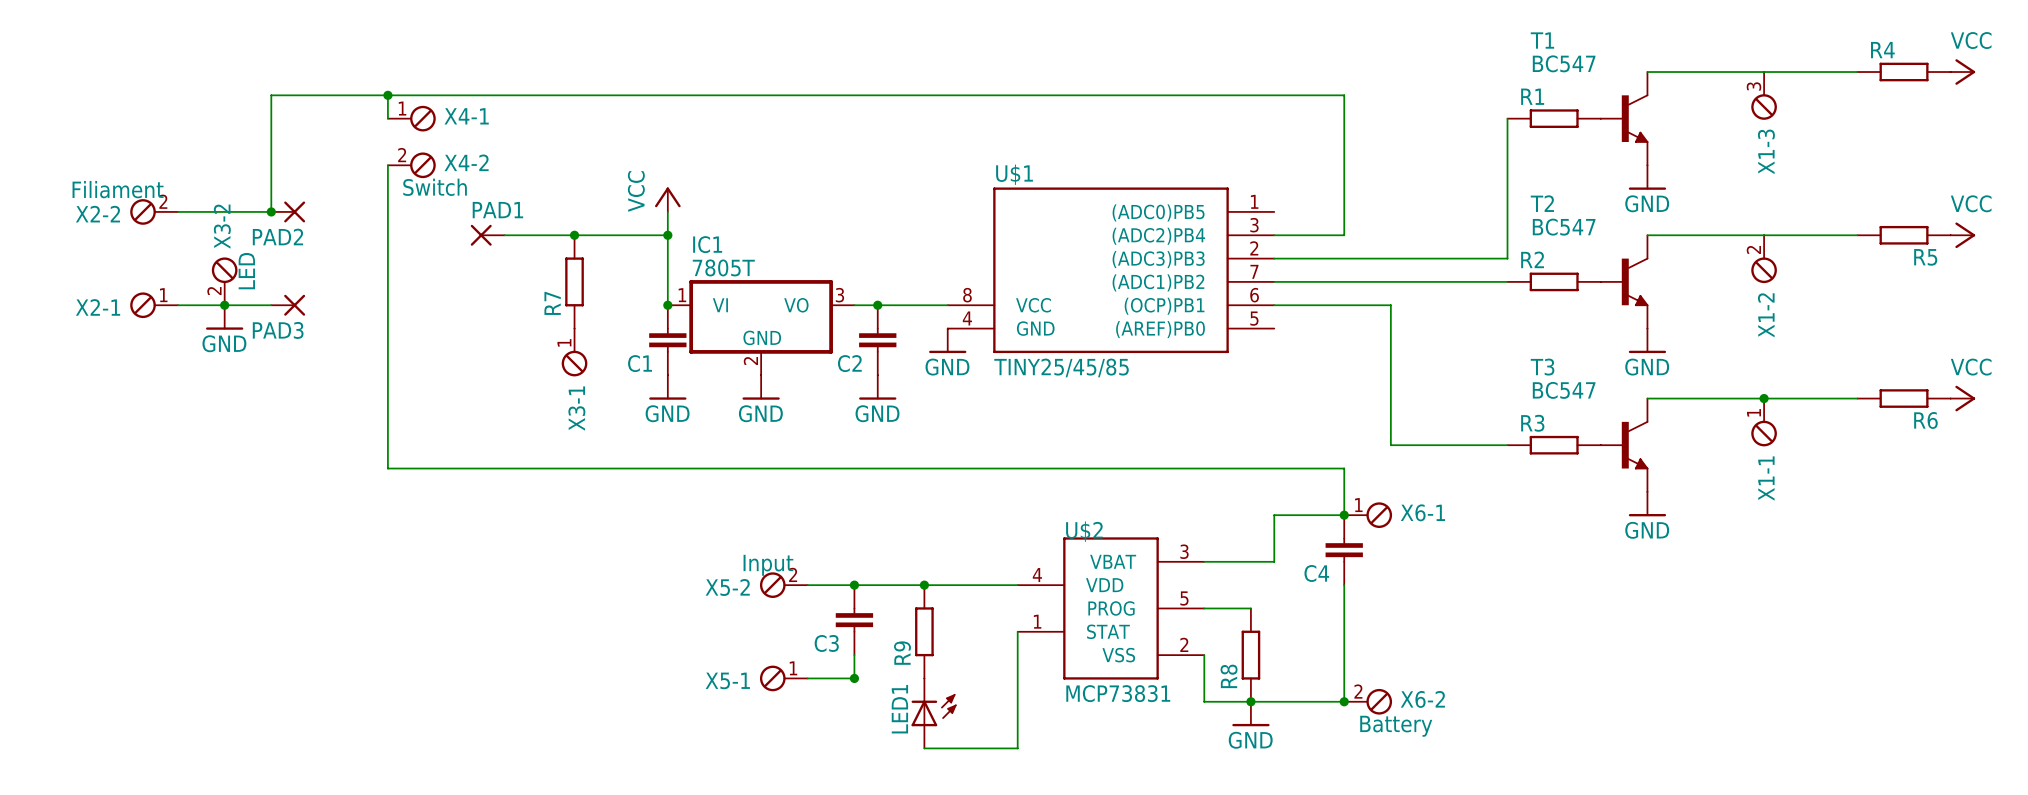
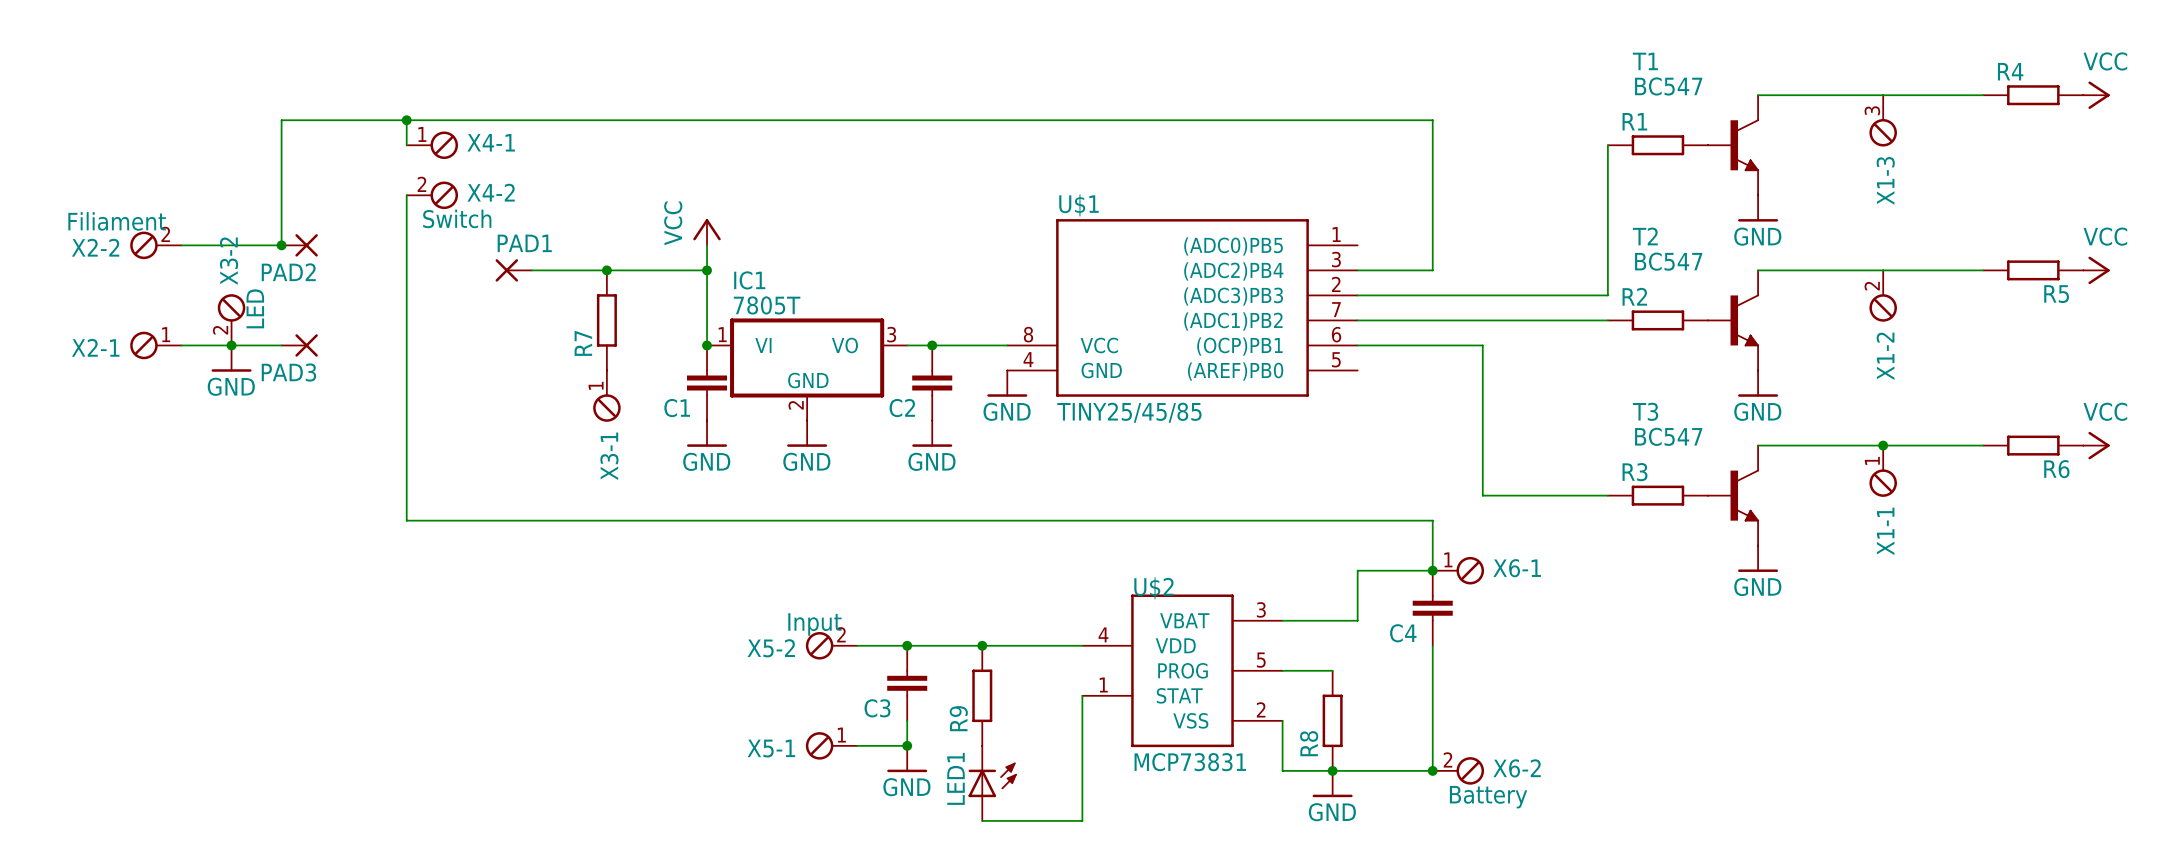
power symbol: none -> GND (907, 759)

